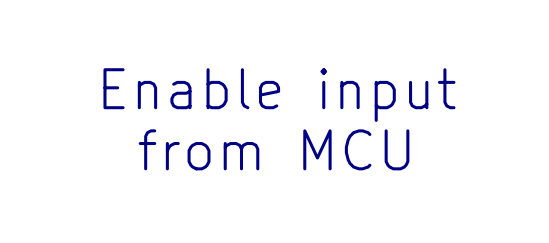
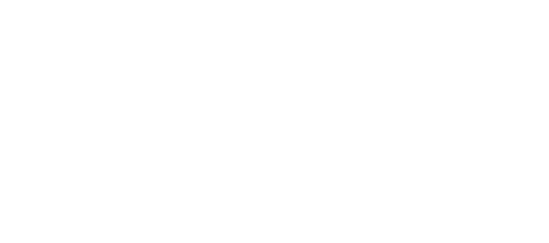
text: Enable input (279, 95) -> none
text: from MCU (274, 149) -> none

